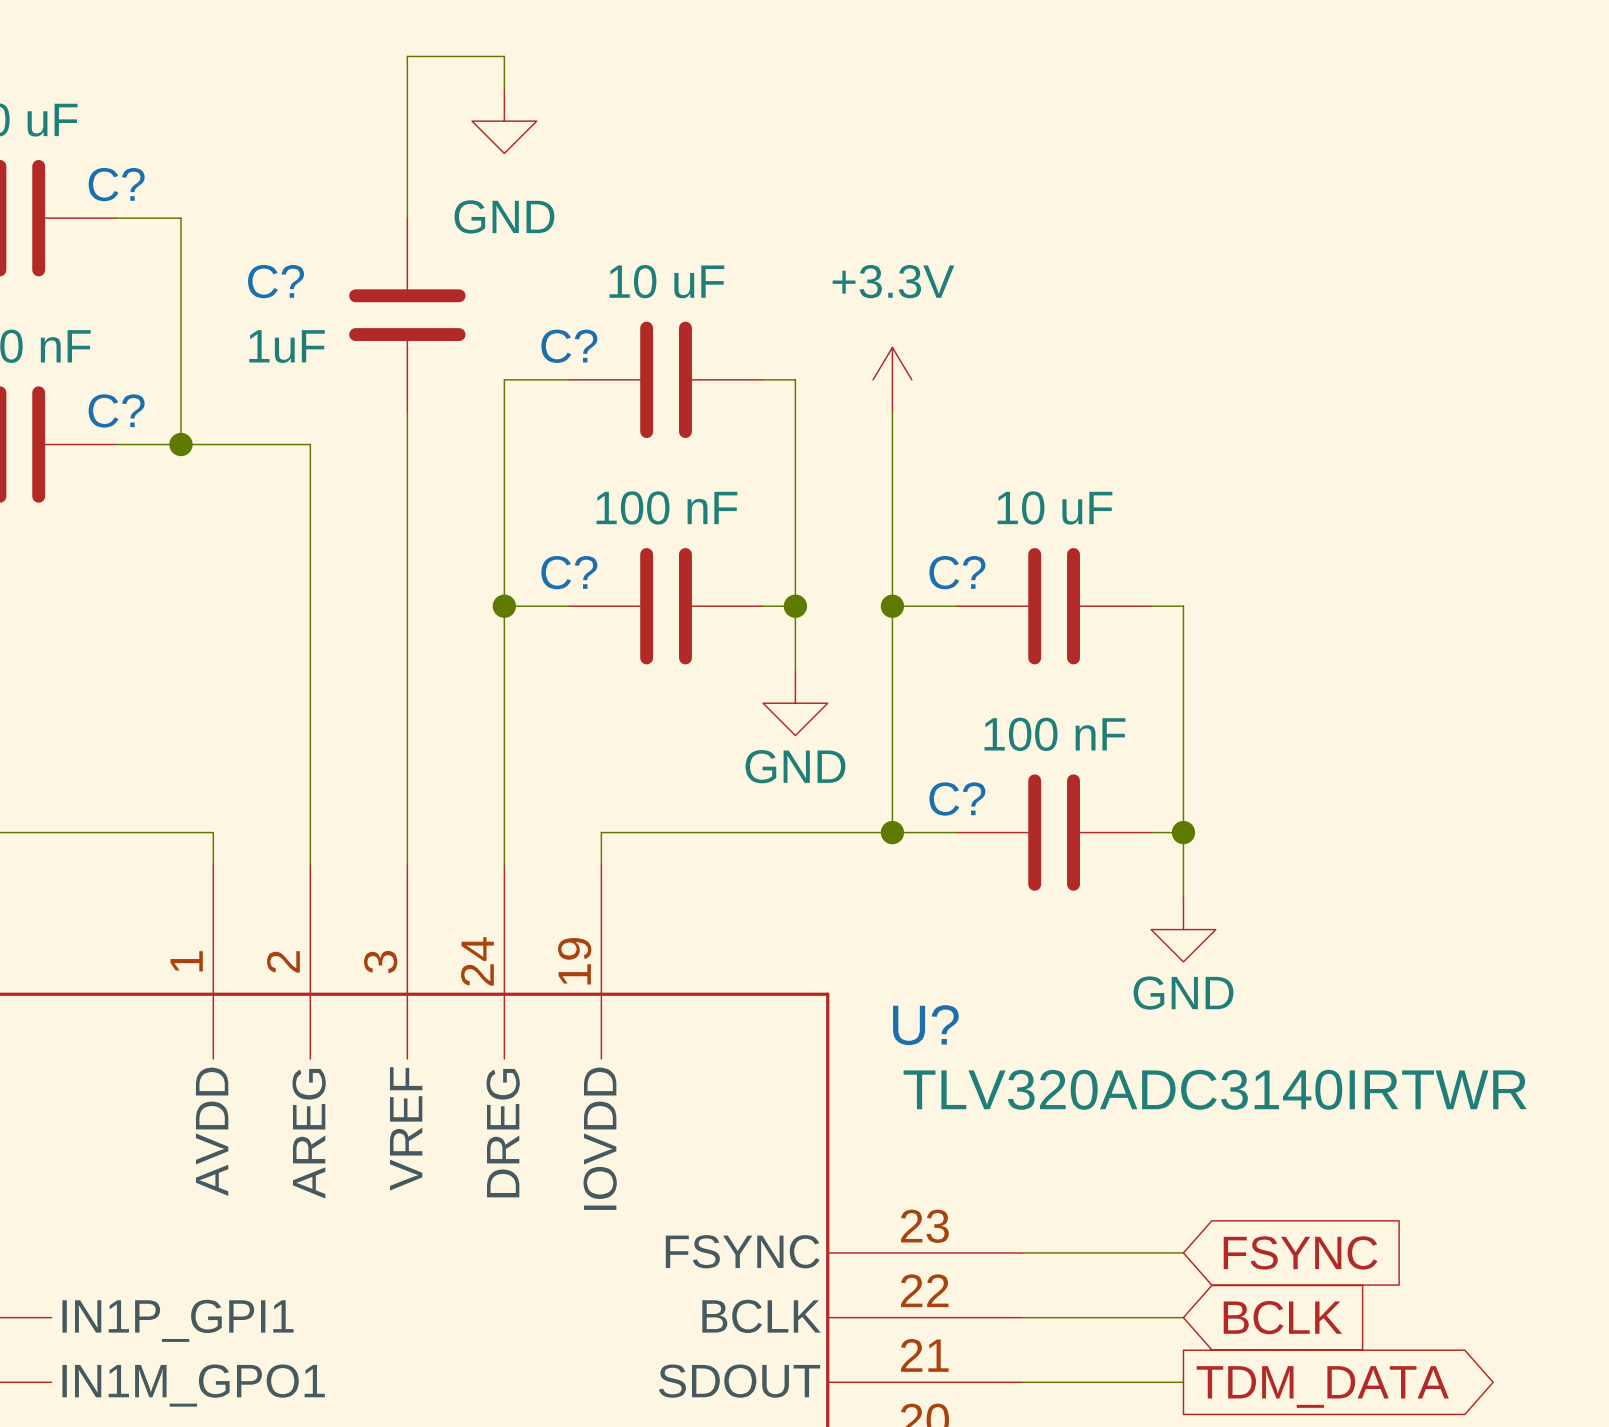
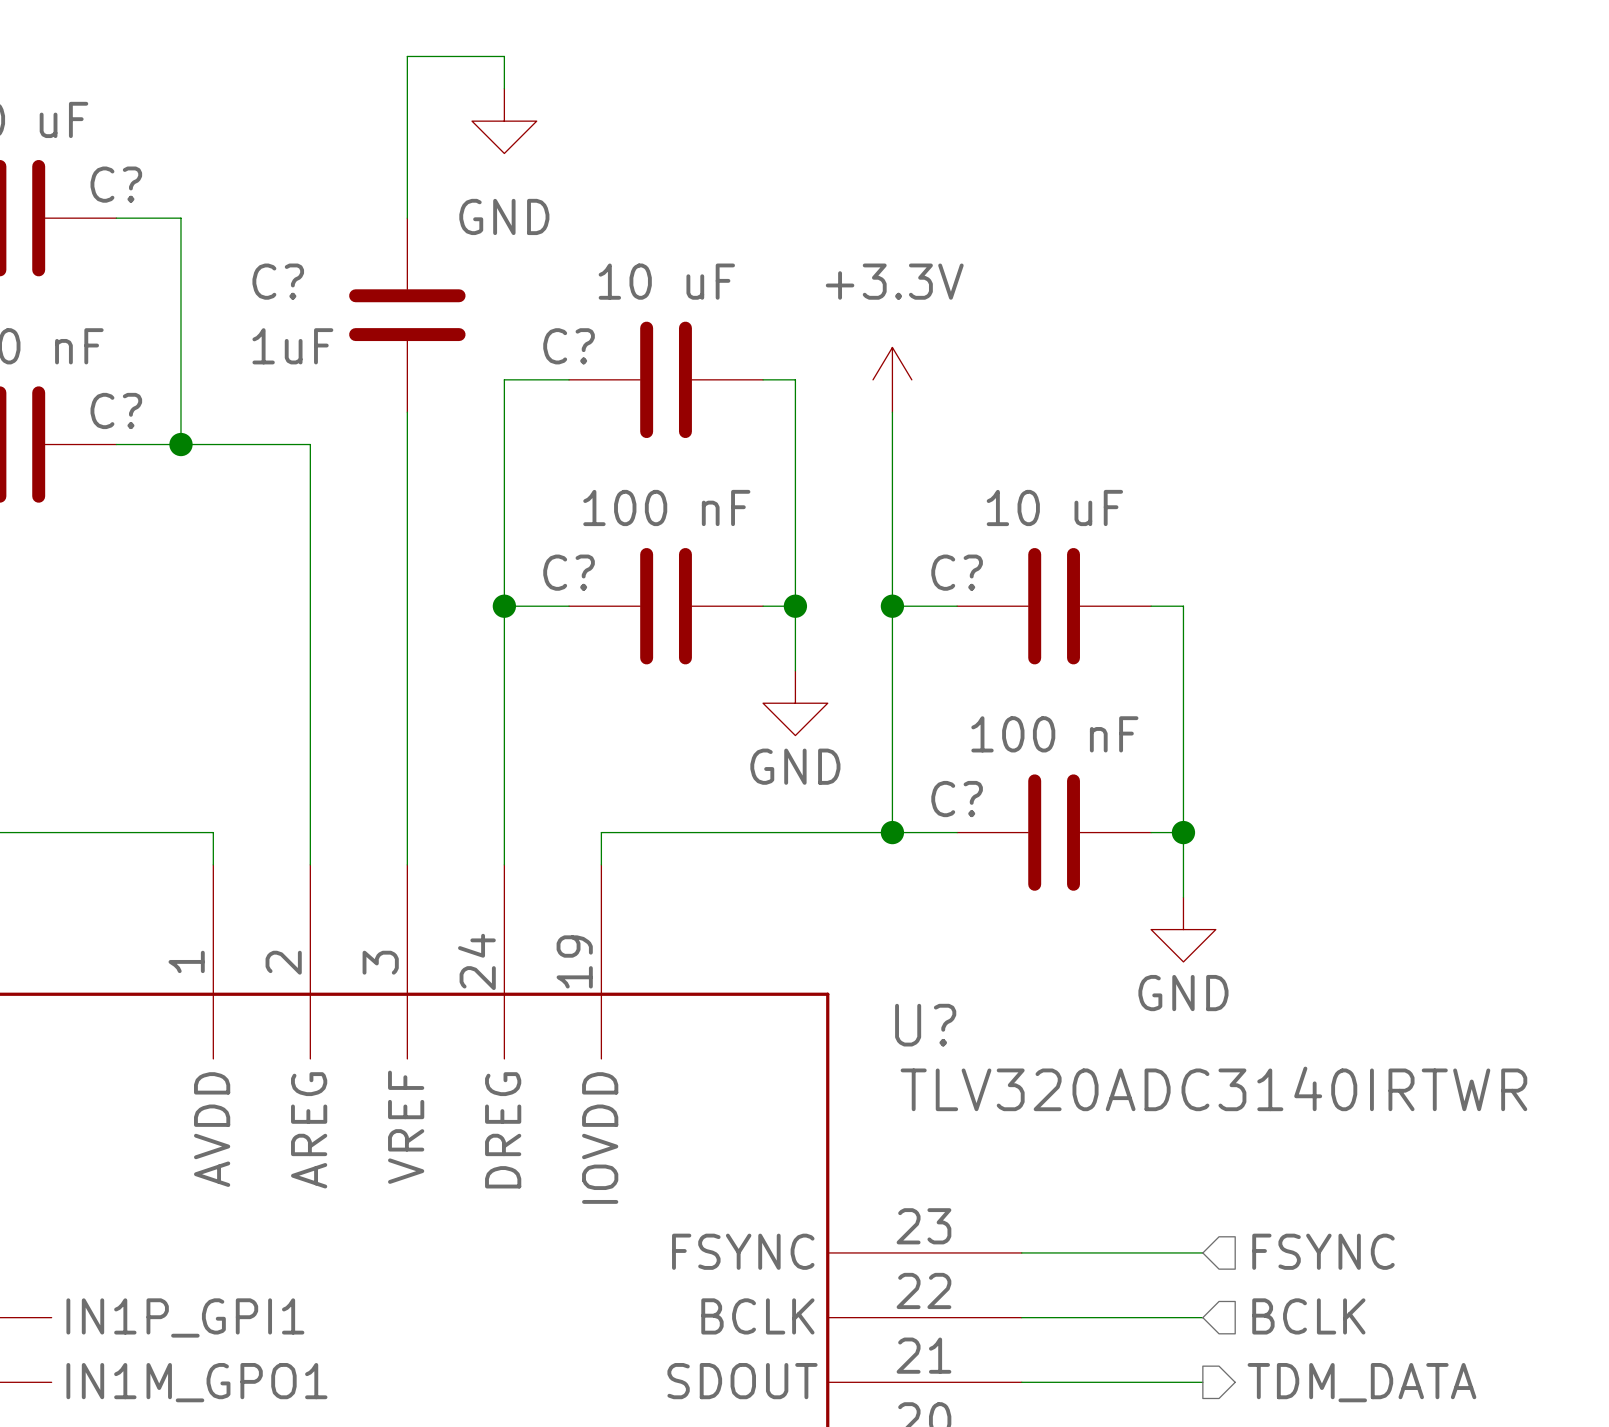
hierarchical label: none -> FSYNC (1323, 1251)
wire: none -> (1183, 1252) (1202, 1252)
global label: FSYNC (1300, 1252) -> none
hierarchical label: none -> BCLK (1308, 1316)
wire: none -> (1183, 1317) (1202, 1317)
global label: BCLK (1282, 1317) -> none
wire: none -> (1183, 1382) (1202, 1382)
hierarchical label: none -> TDM_DATA (1361, 1382)
global label: TDM_DATA (1322, 1386) -> none

